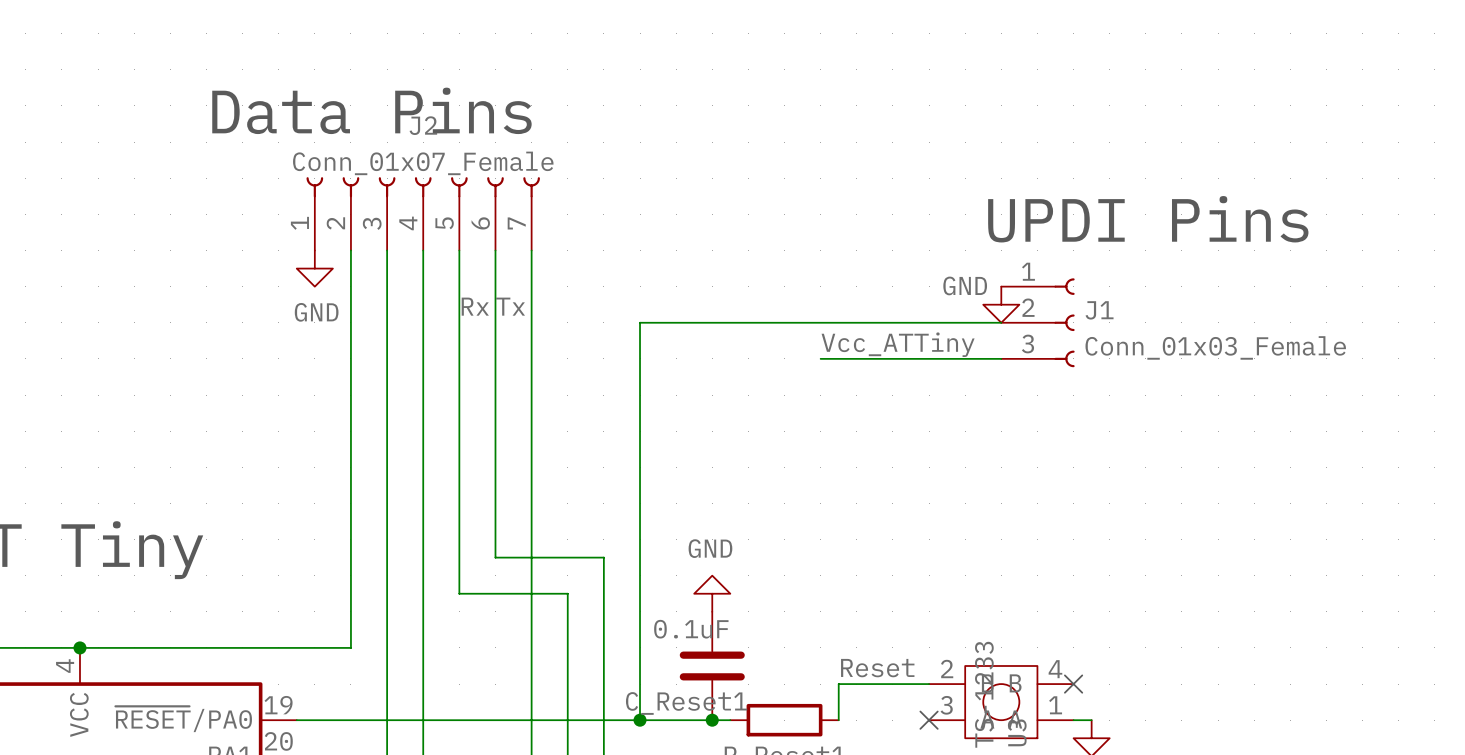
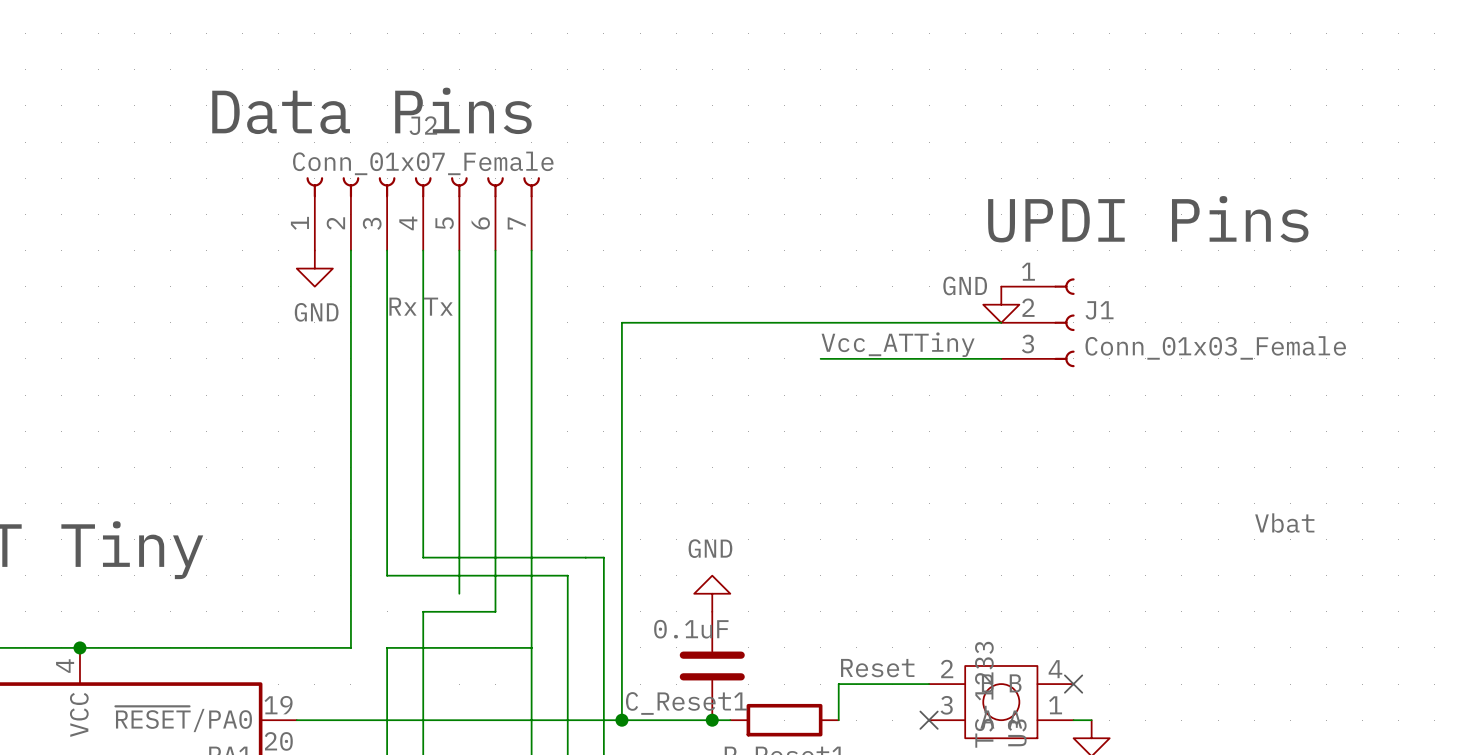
label position: Rx (475, 306) -> Rx (403, 306)
label position: Tx (510, 306) -> Tx (438, 306)
wire: (640, 322) (640, 720) -> (640, 322) (621, 322) (621, 720)
label: none -> Vbat (1284, 523)
wire: (423, 557) (423, 611) -> (423, 557) (495, 557) (495, 611) (423, 611)
wire: (387, 575) (387, 647) -> (531, 647) (387, 647)
wire: (459, 593) (567, 593) -> (387, 575) (567, 575) (567, 593)
junction position: (640, 720) -> (621, 720)

